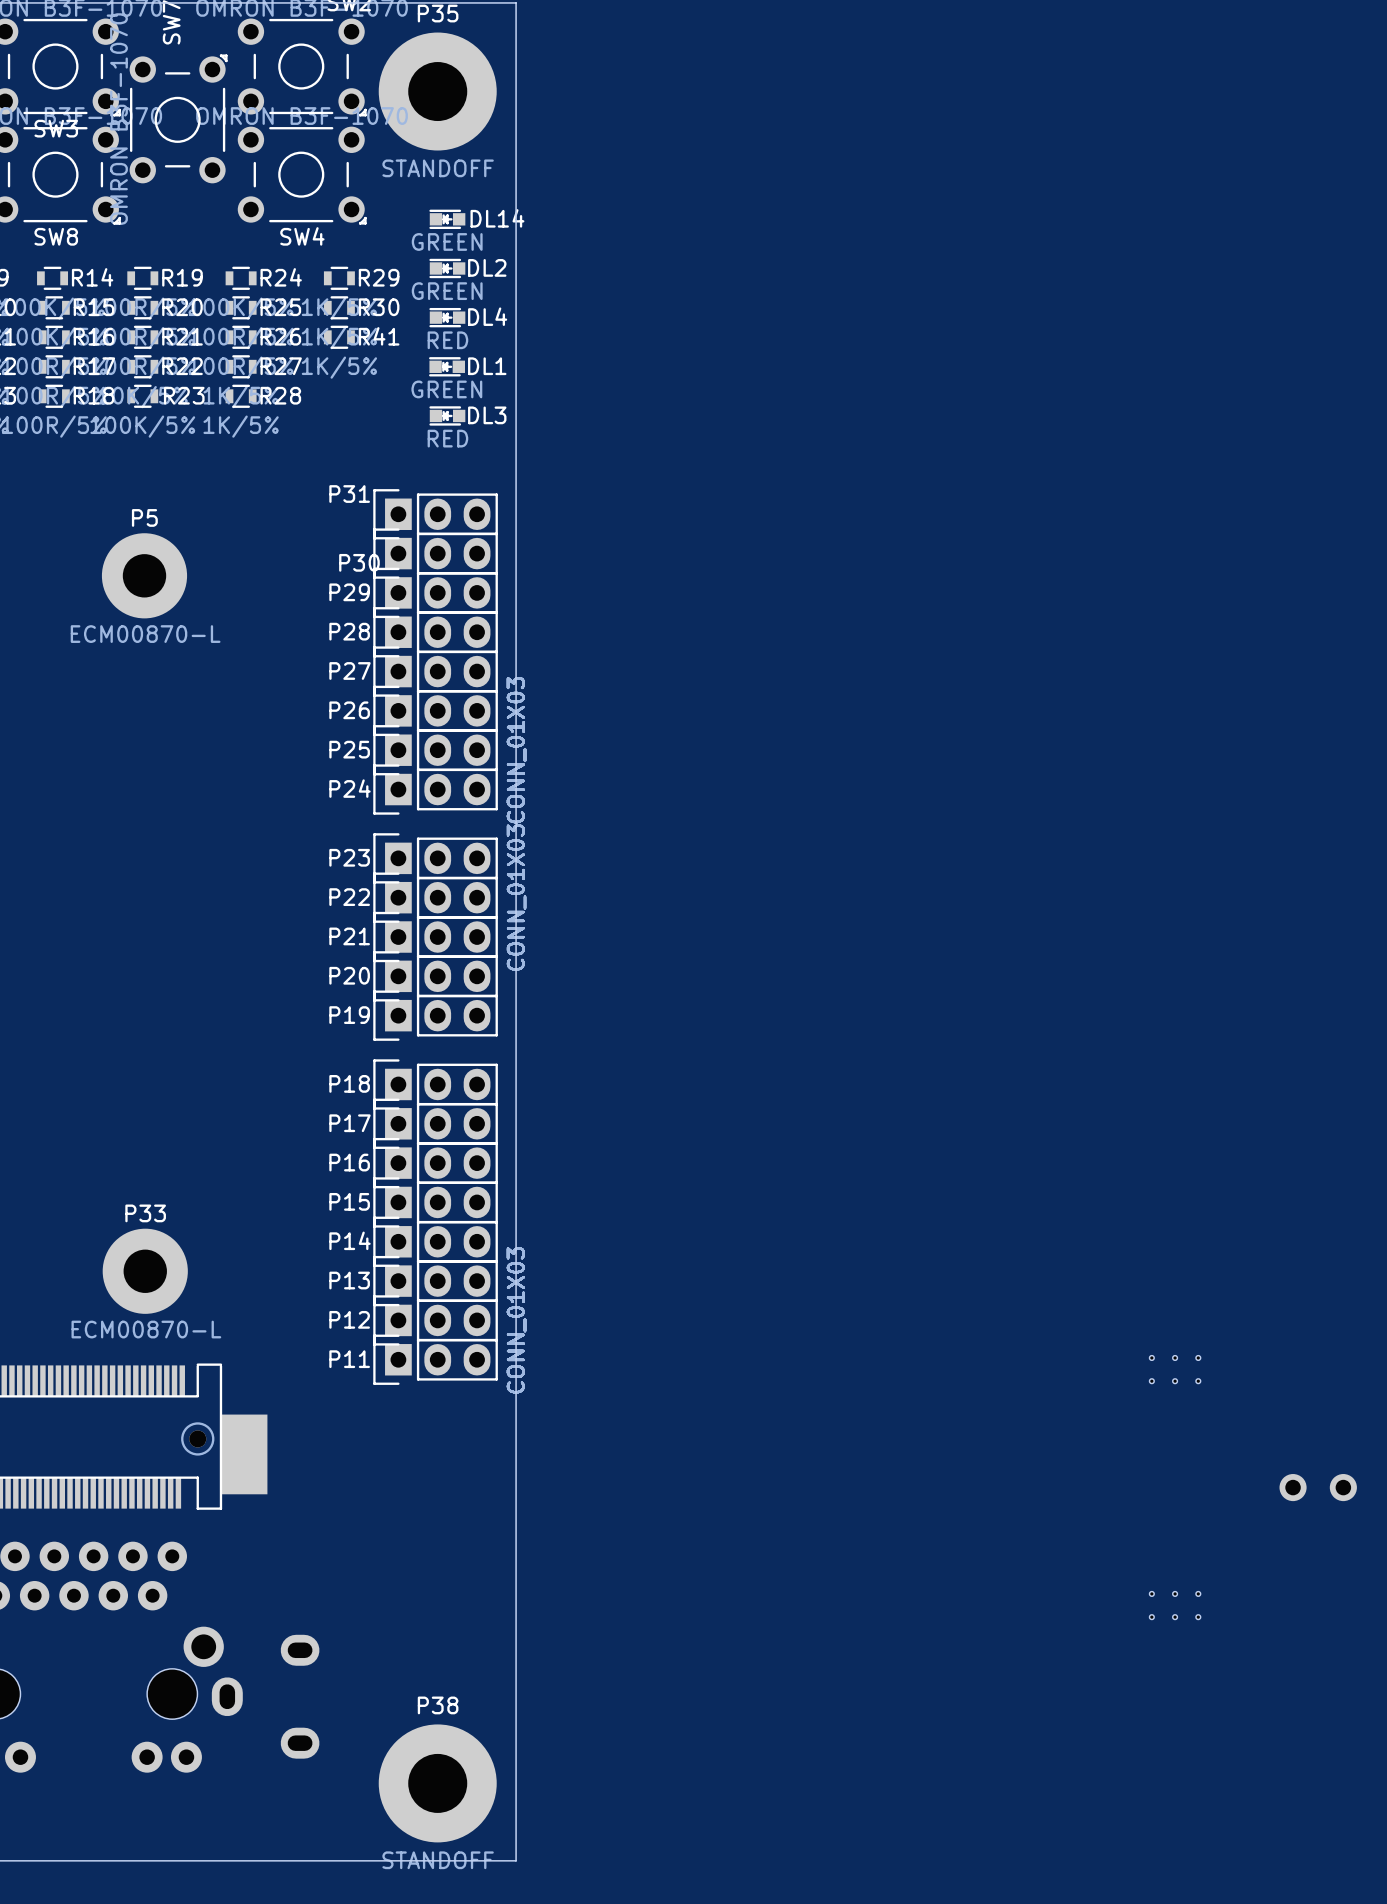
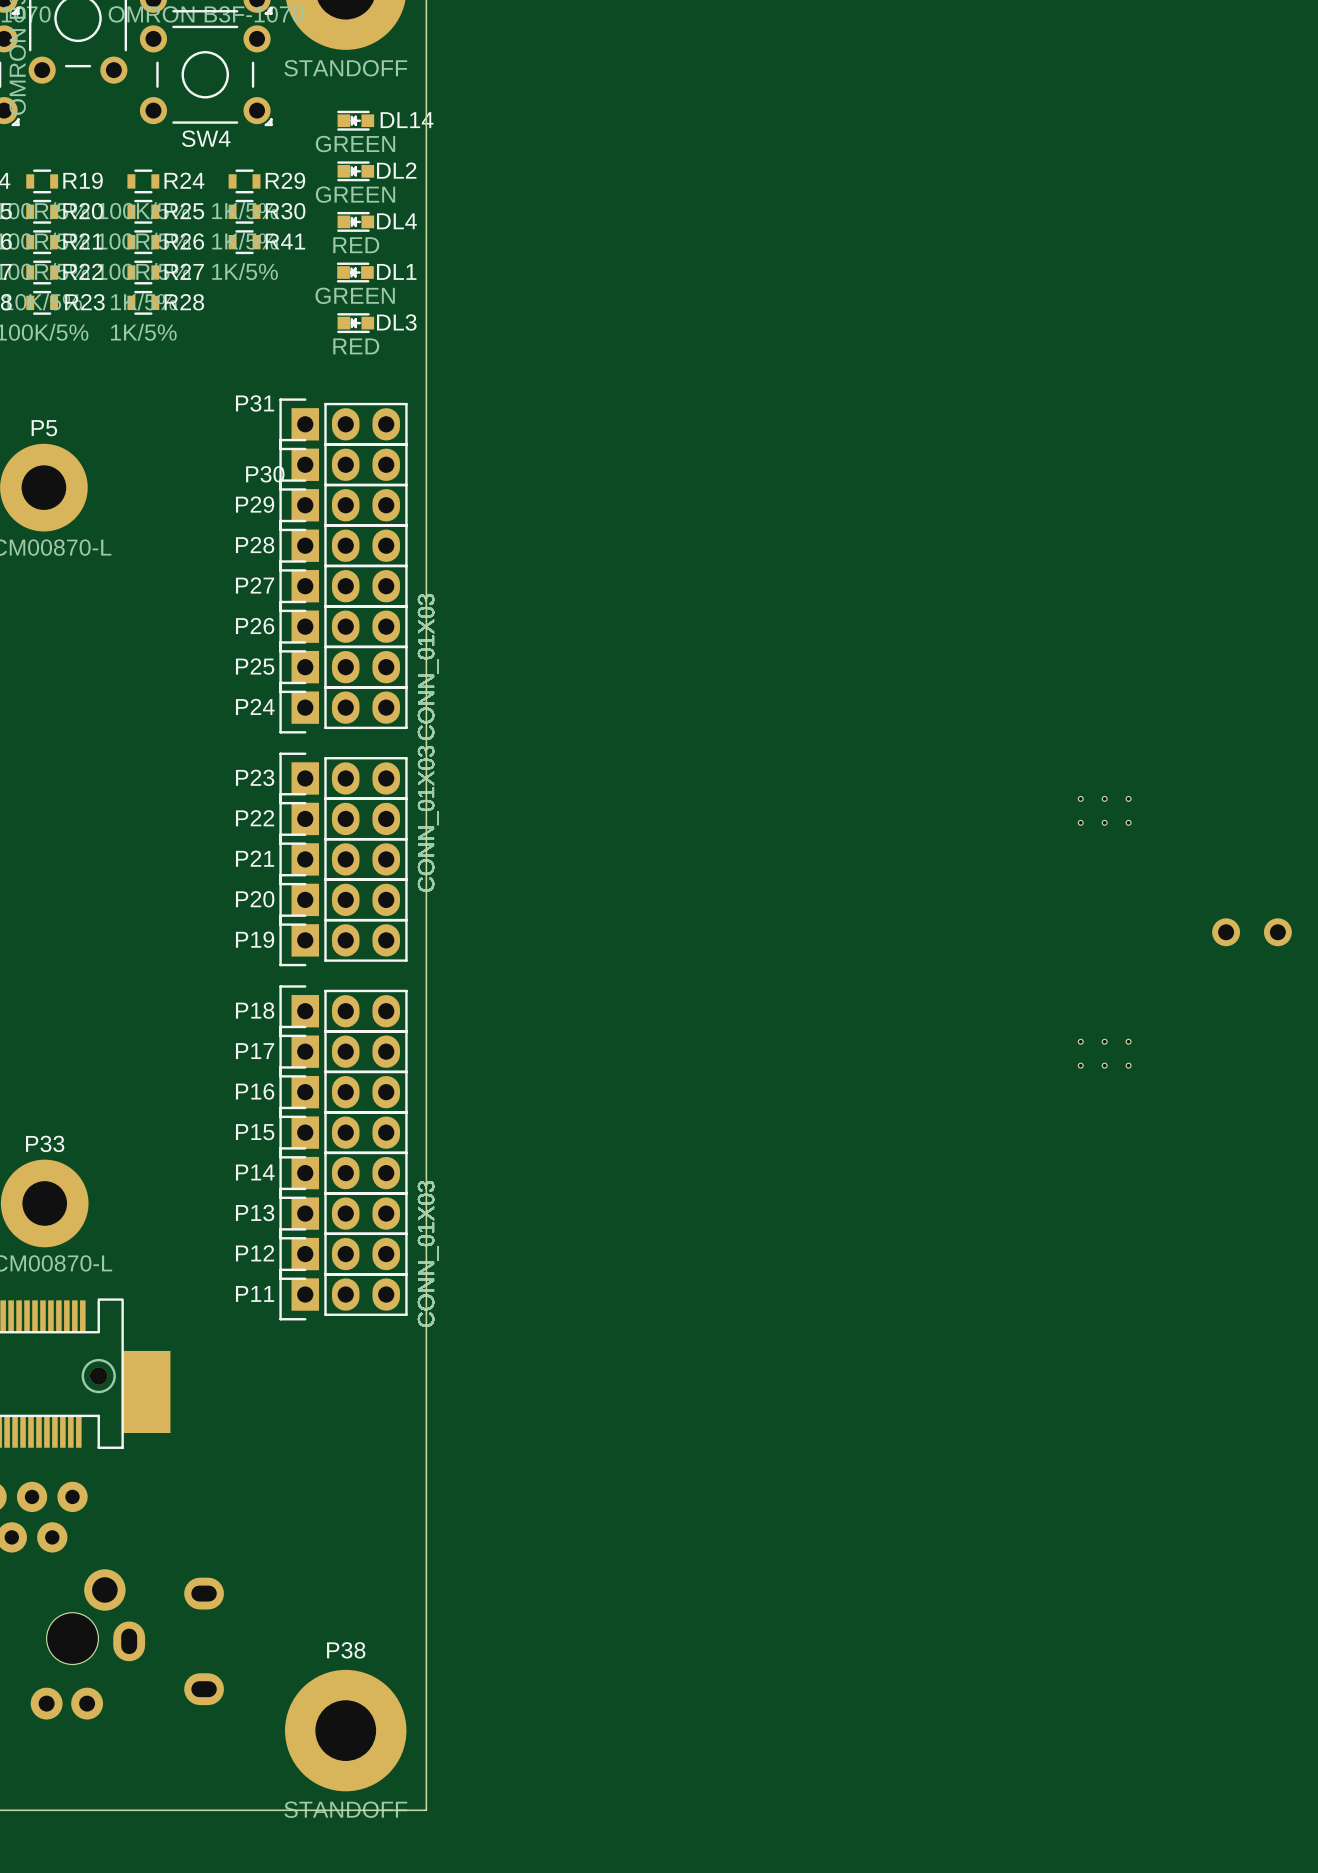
part: none -> (1104, 810)
part: none -> (1251, 932)
part: none -> (1104, 1053)
part: (1175, 1369) -> none
part: (1318, 1487) -> none
part: (1175, 1605) -> none

